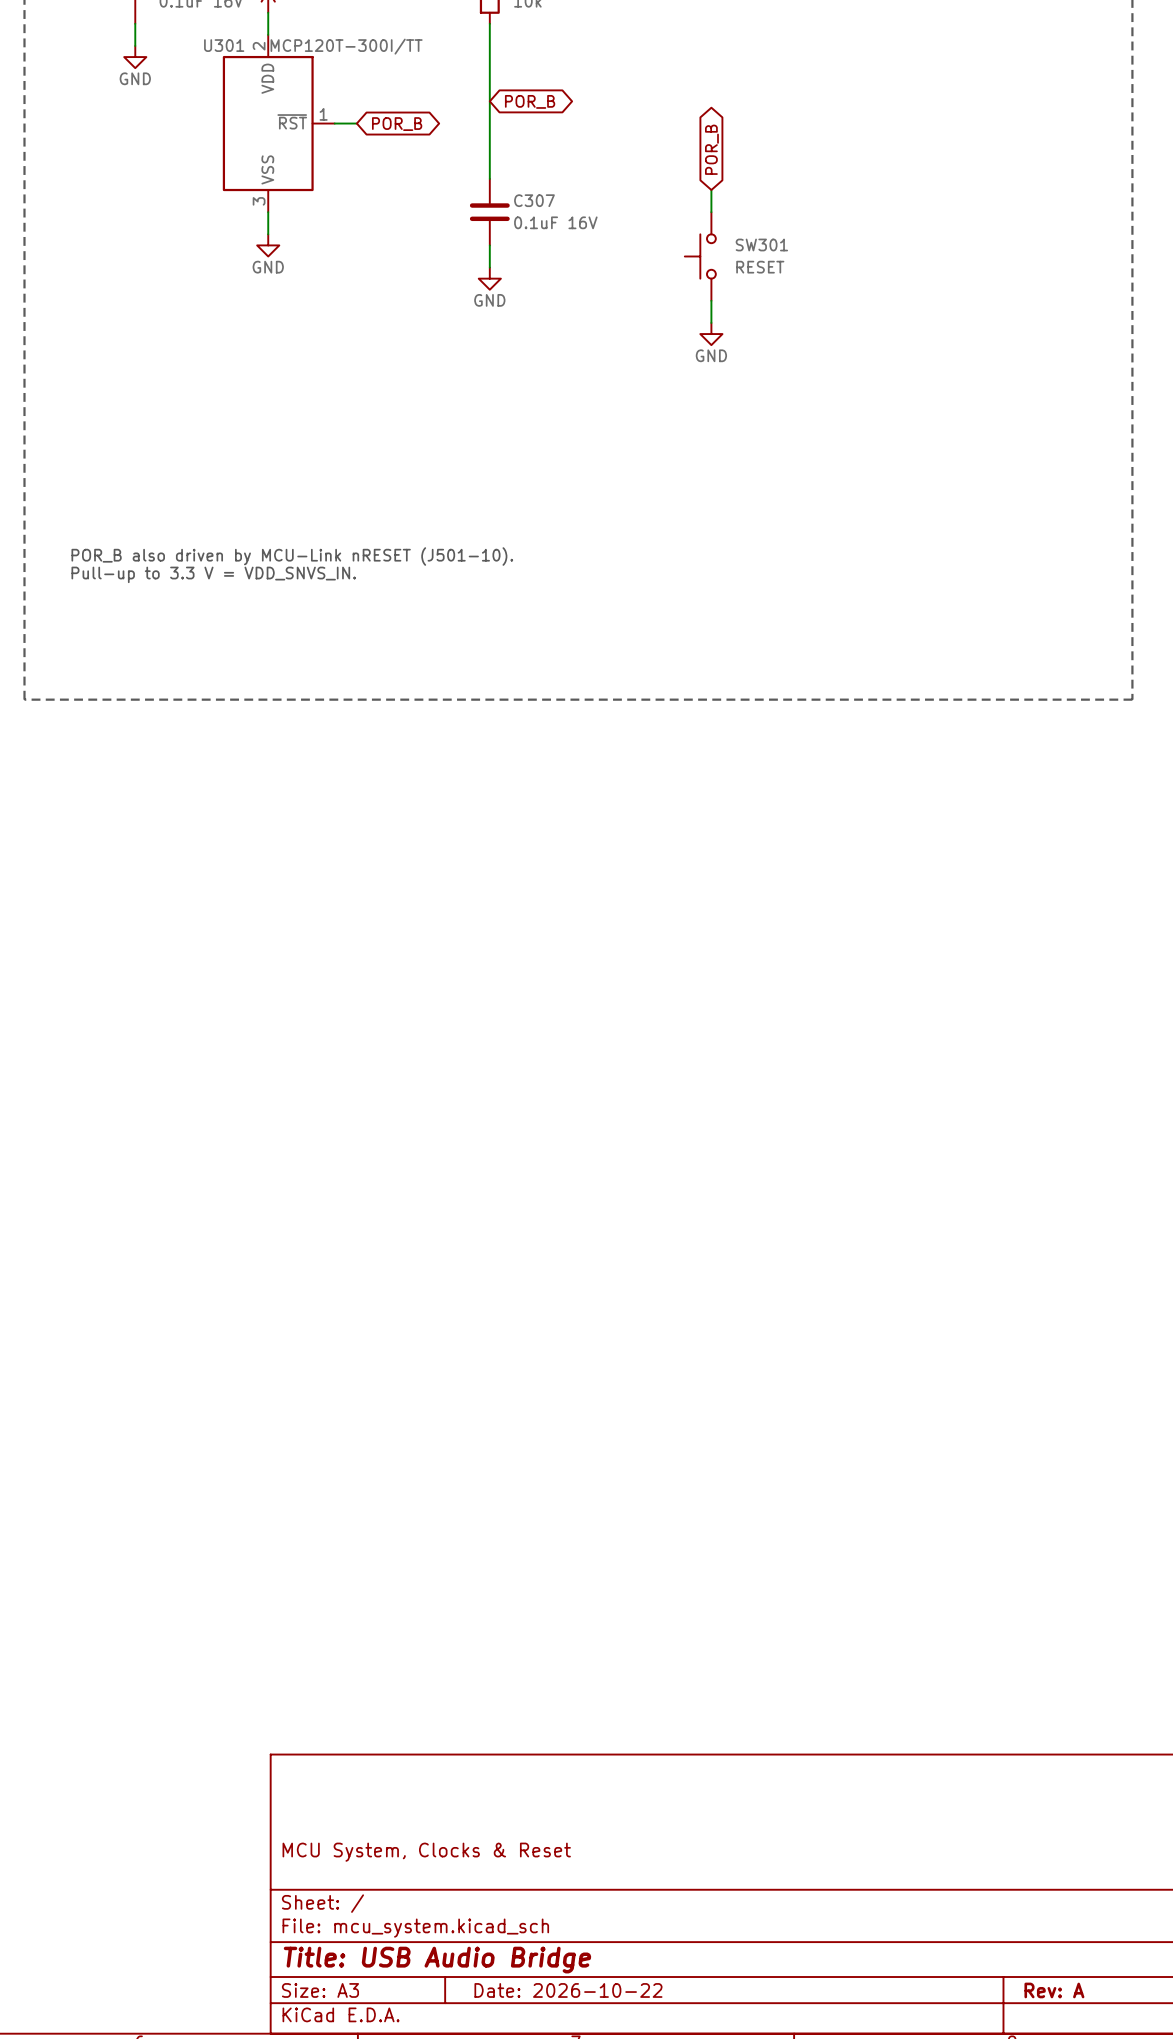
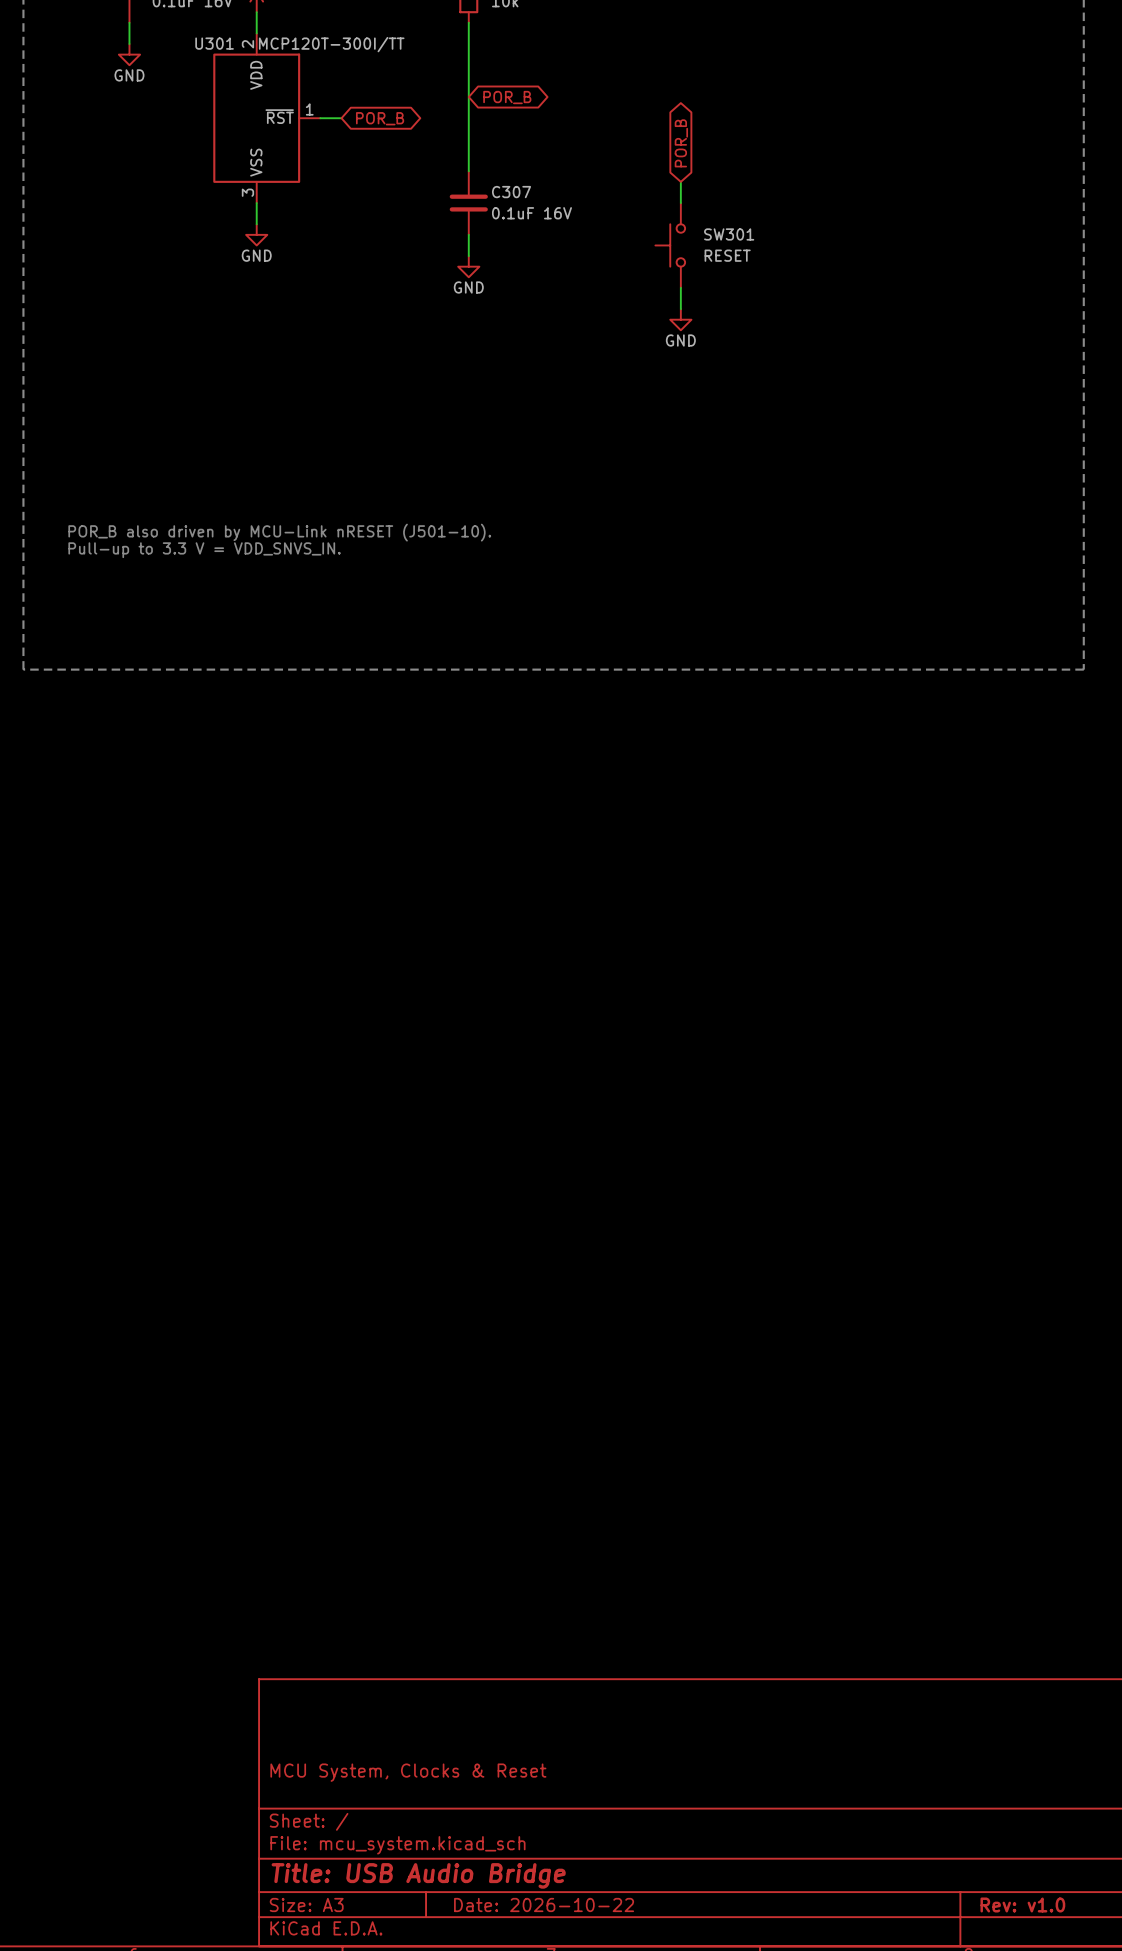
title block: Rev: A (1054, 1990) -> Rev: v1.0 (1022, 1904)

